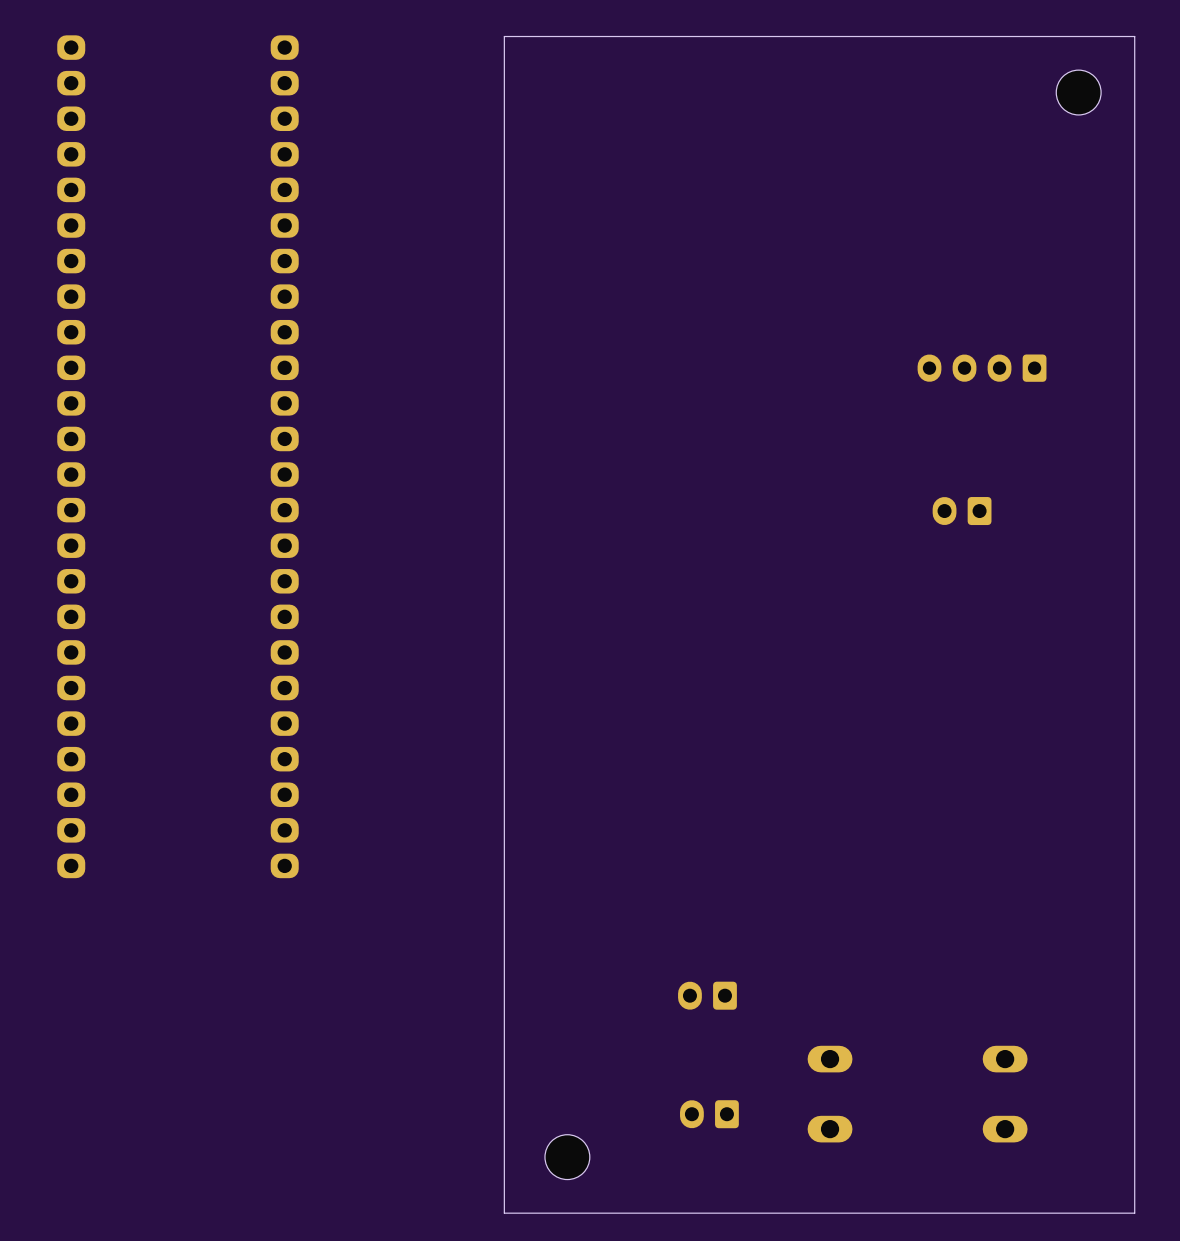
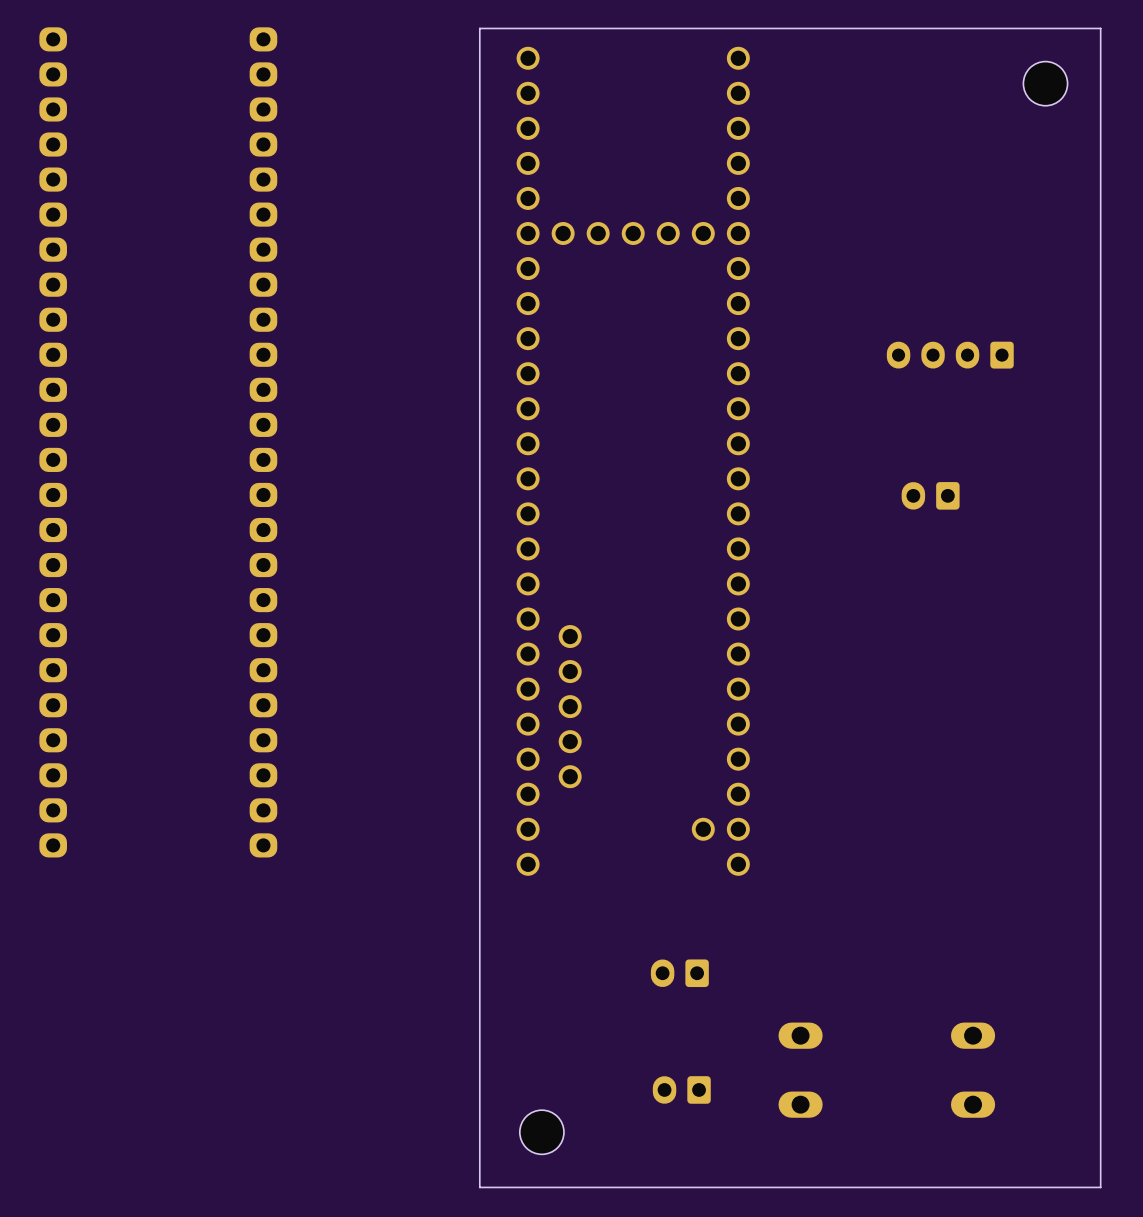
part: none -> (633, 461)

